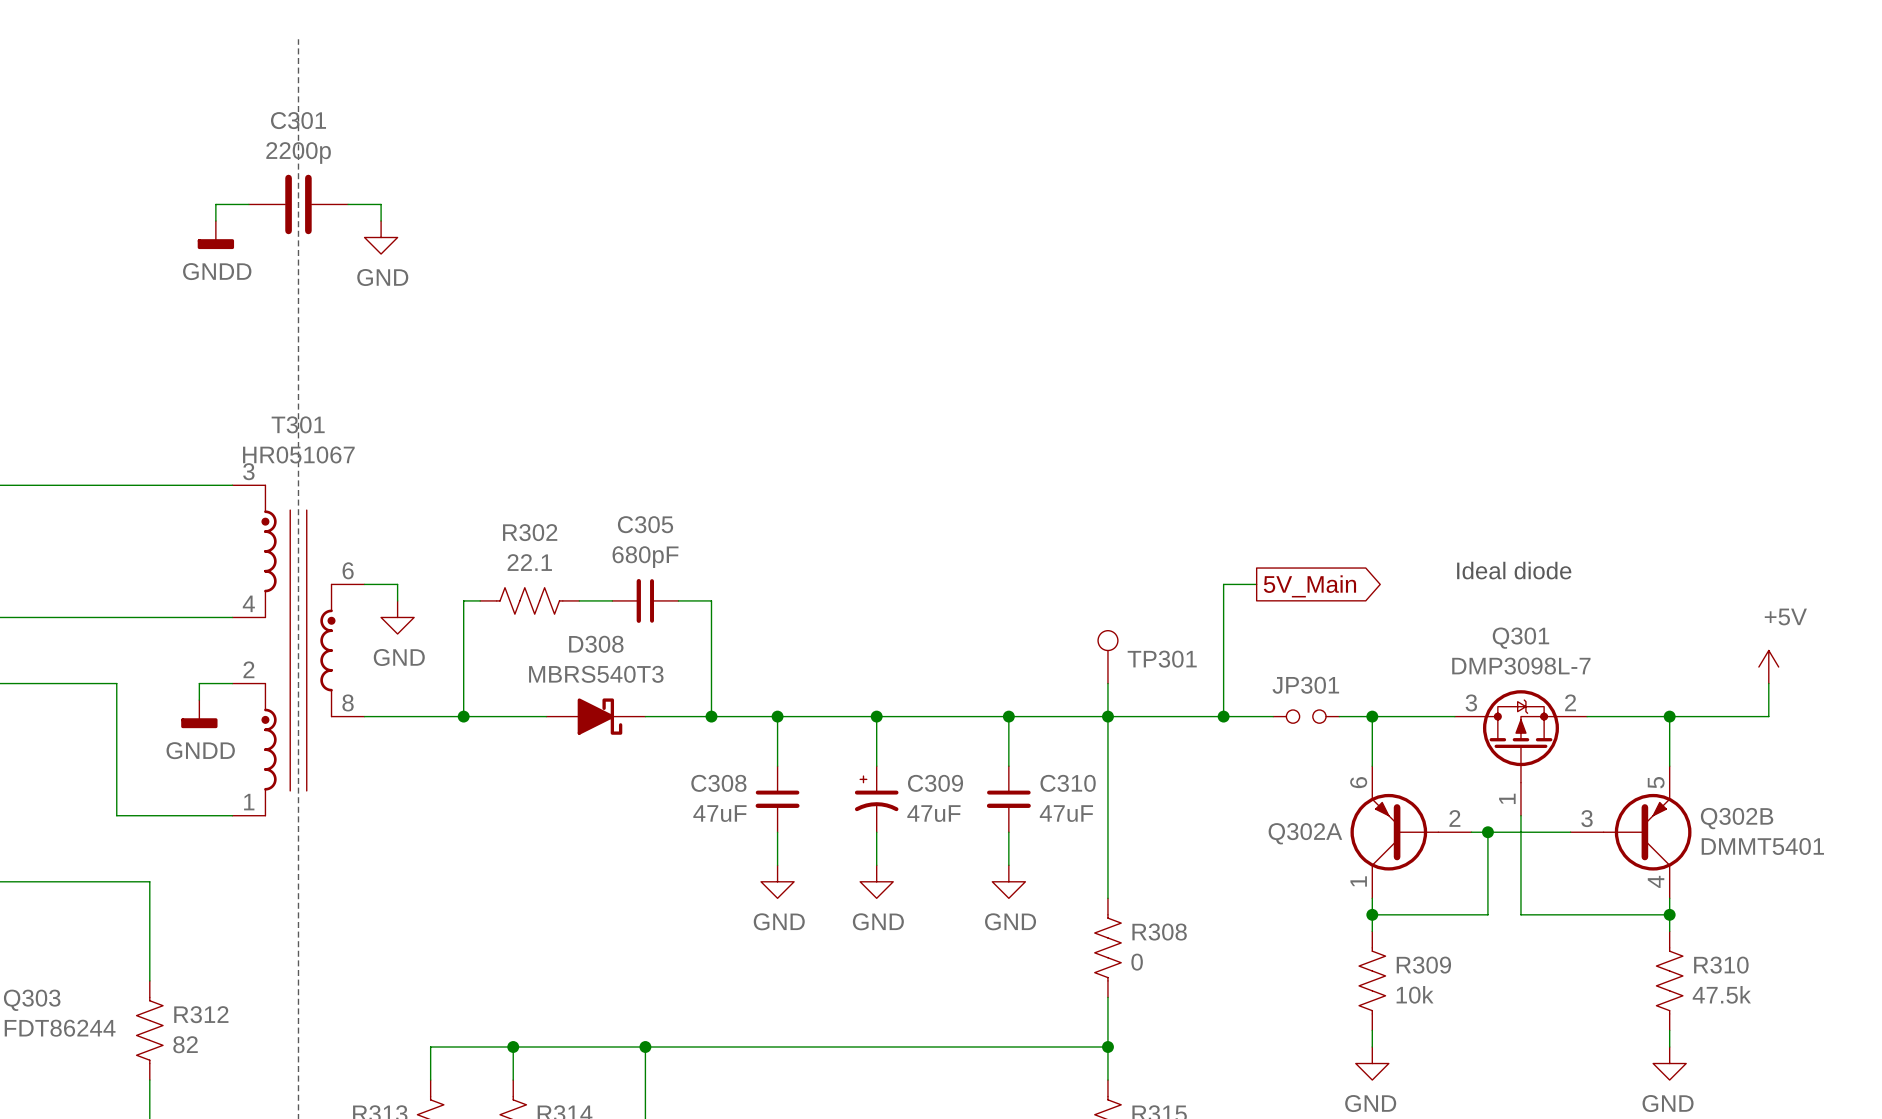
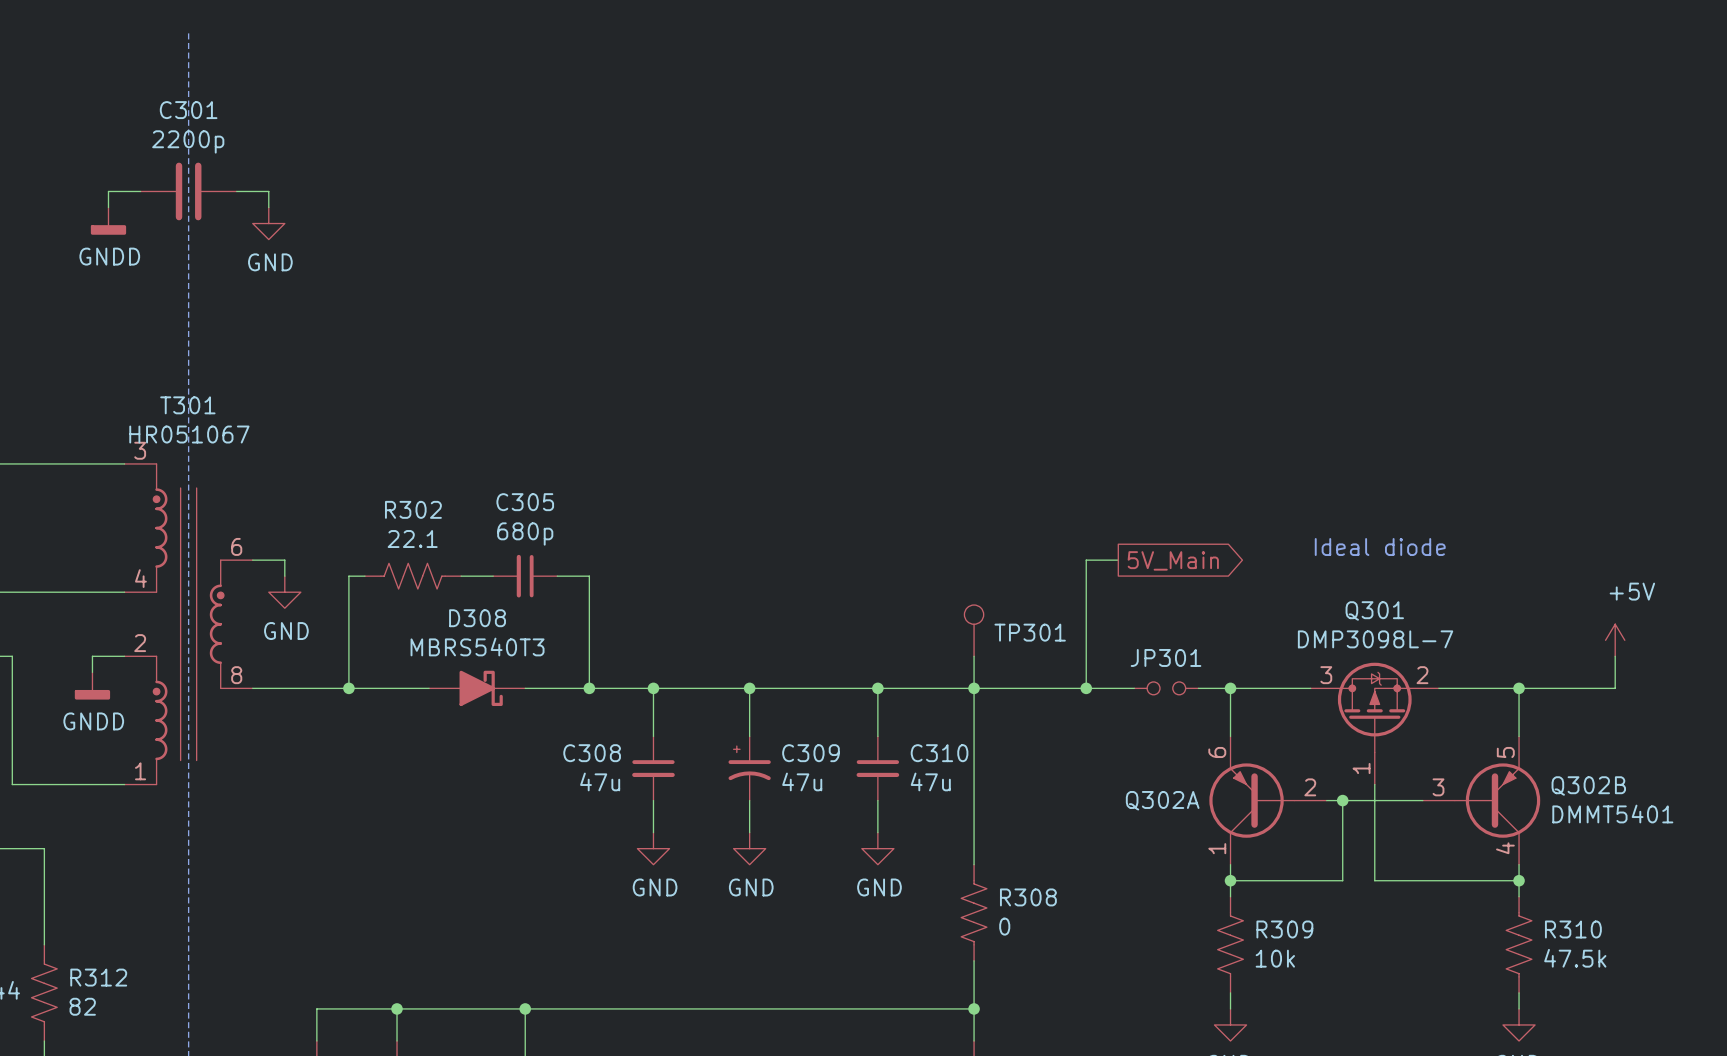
C305 value: 680pF (645, 557) -> 680p (525, 534)
C308 value: 47uF (719, 813) -> 47u (600, 781)
C309 value: 47uF (933, 813) -> 47u (802, 781)
C310 value: 47uF (1066, 813) -> 47u (930, 781)

